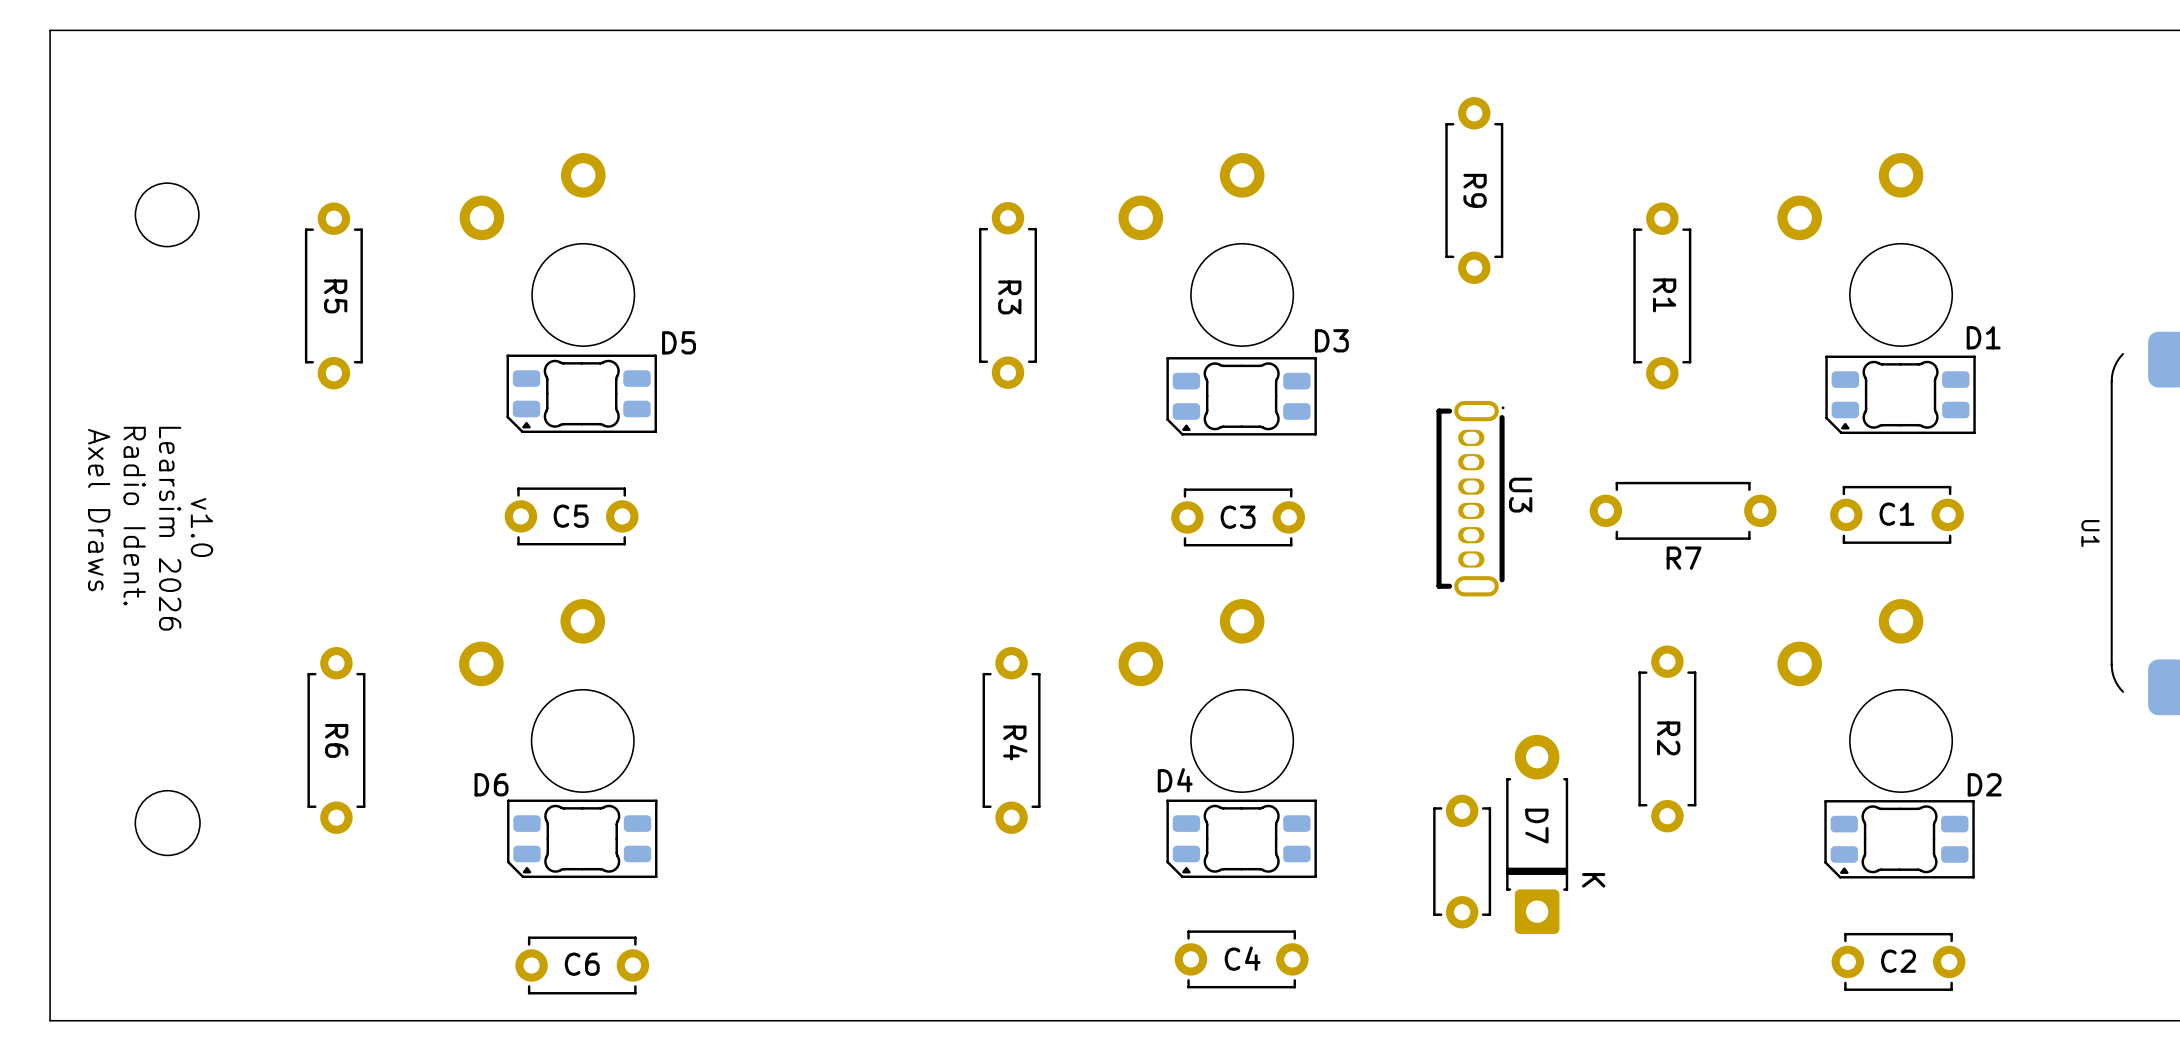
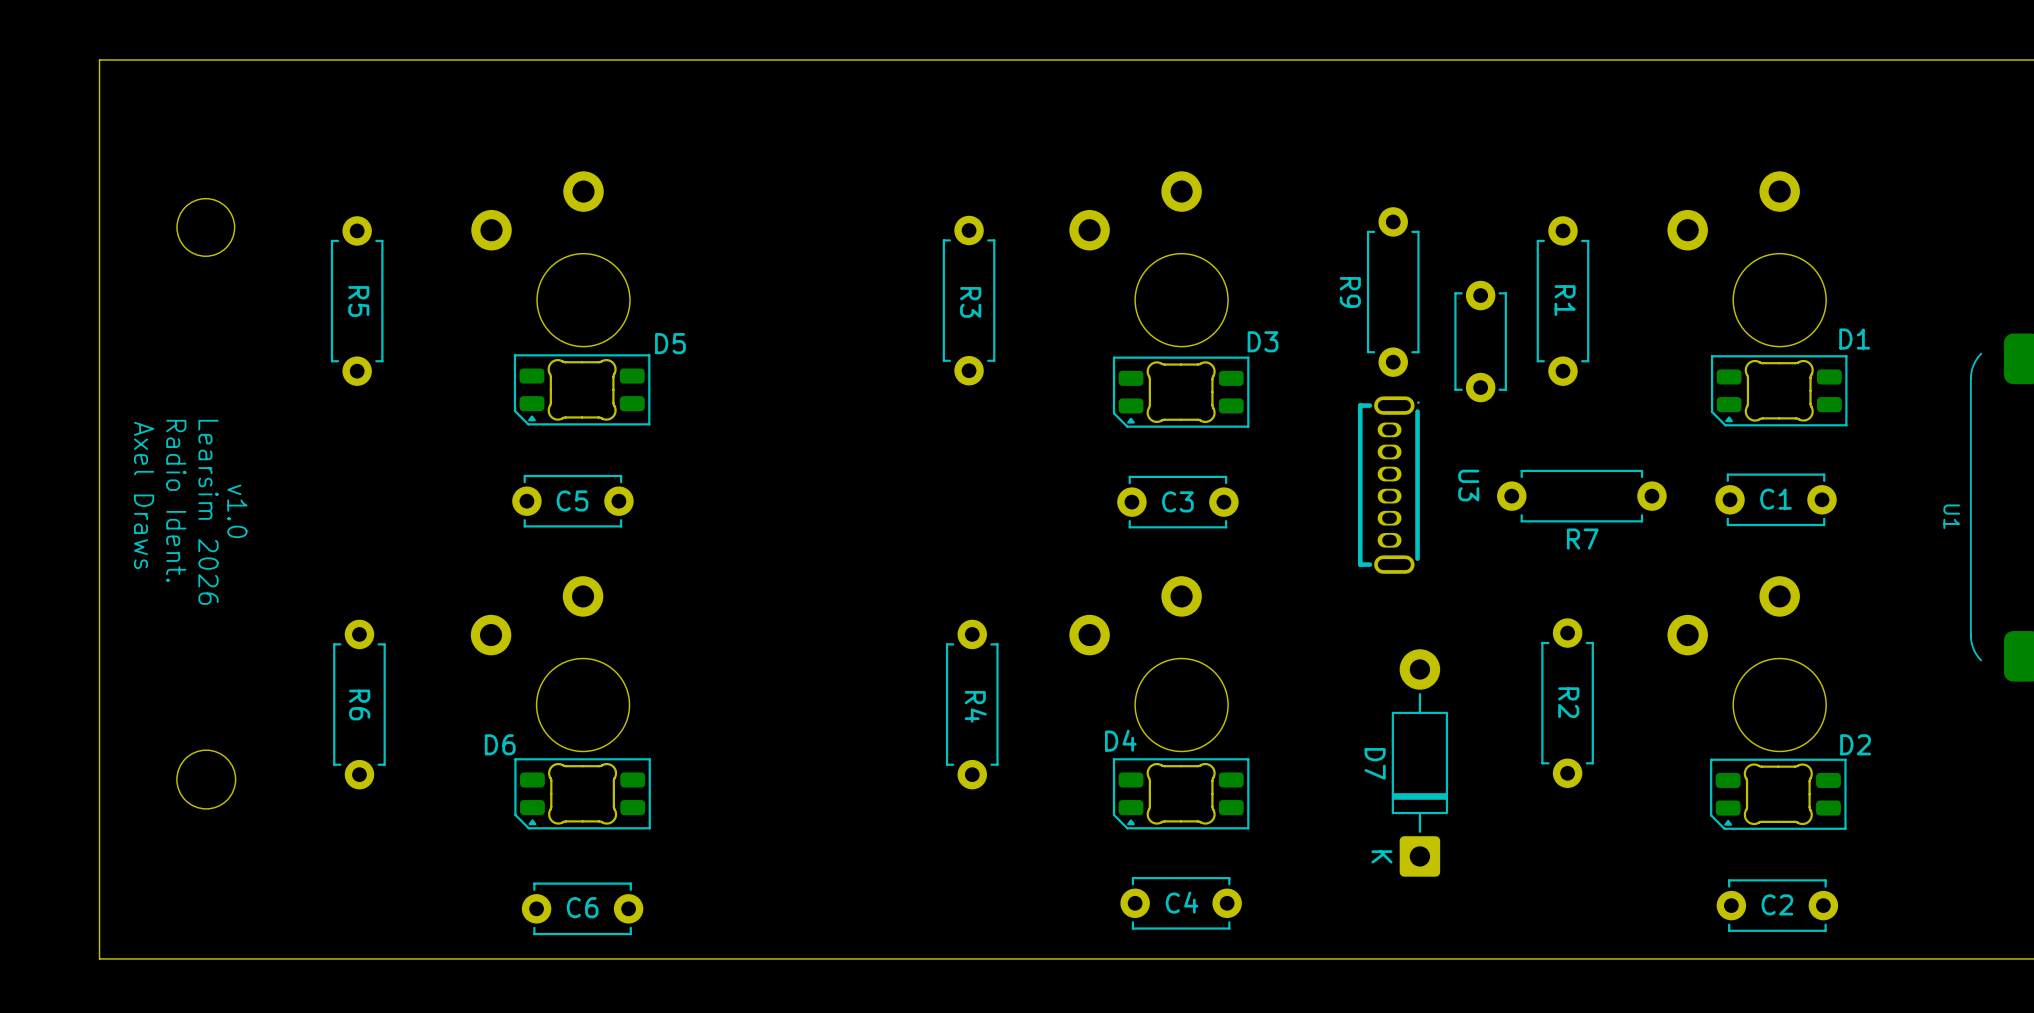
R9 position: (1474, 190) -> (1393, 292)
R9 name position: R9 (1475, 190) -> R9 (1350, 292)
part: none -> (1480, 341)
U3 name position: U3 (1520, 495) -> U3 (1468, 485)
D7 footprint: [1506, 734, 1569, 934] -> [1391, 649, 1449, 877]
D7 name position: D7 (1536, 826) -> D7 (1375, 763)
part: (1462, 861) -> none

